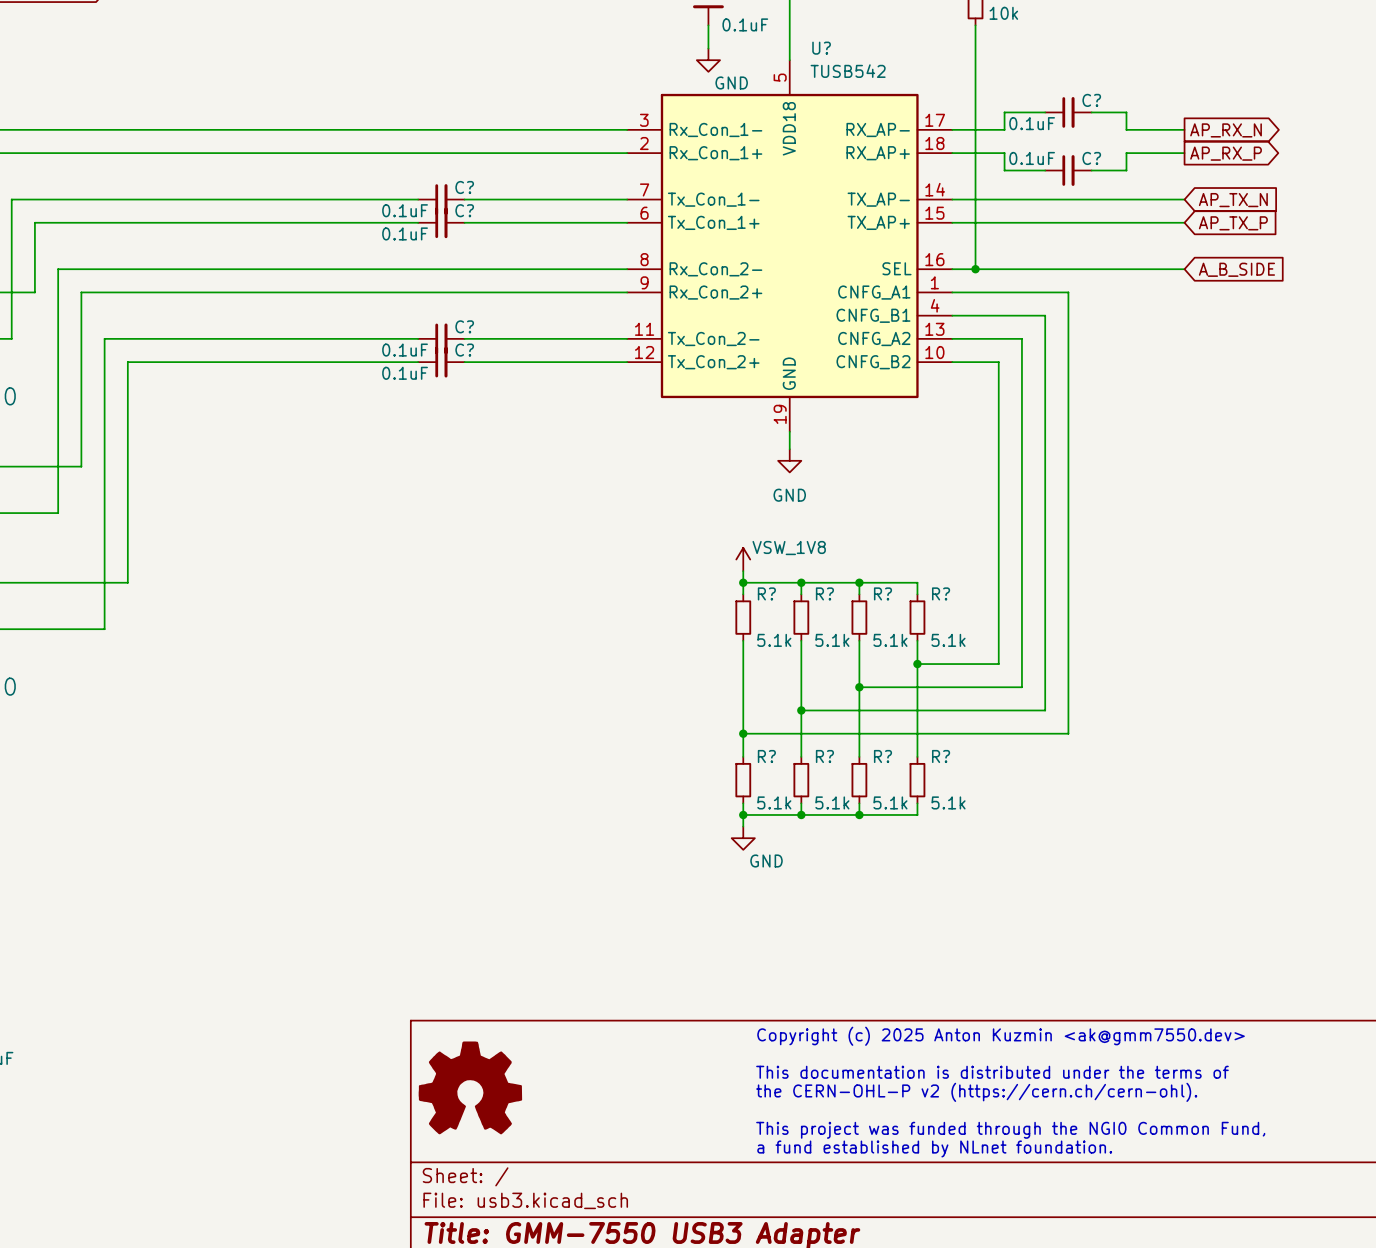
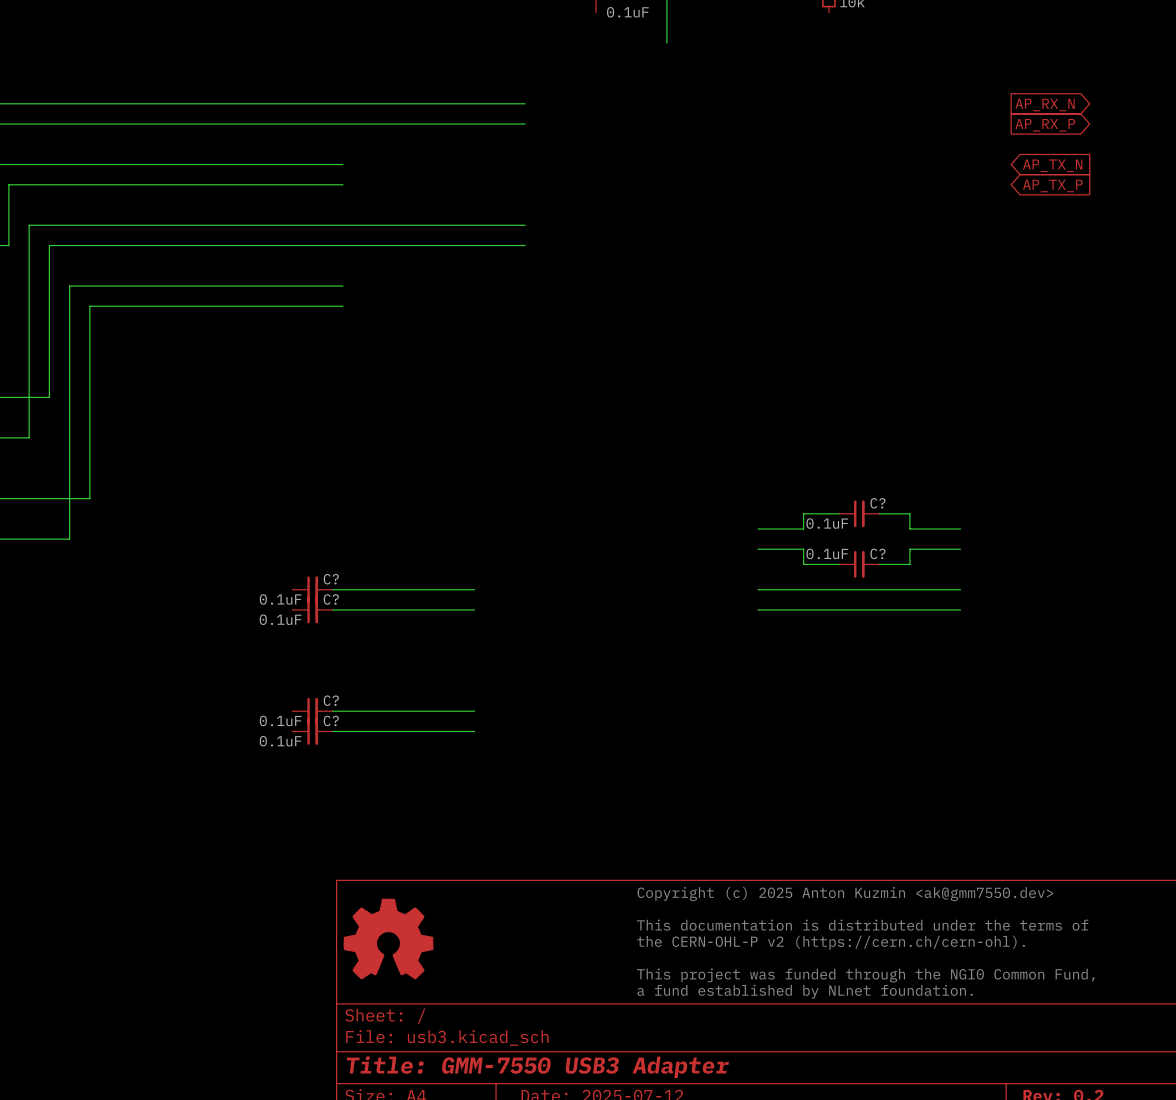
wire: (708, 25) (708, 48) -> none
wire: (975, 25) (975, 269) -> none
power symbol: GND (708, 60) -> none
wire: (1045, 112) (1004, 112) (1004, 129) (952, 129) -> none
C?: 0.1uF (1068, 112) -> none
wire: (1091, 112) (1126, 112) (1126, 129) (1184, 129) -> none
wire: (952, 153) (1004, 153) (1004, 170) (1045, 170) -> none
wire: (1184, 153) (1126, 153) (1126, 170) (1091, 170) -> none
C?: 0.1uF (1068, 170) -> none
C?: 0.1uF (441, 199) -> none
wire: (464, 199) (627, 199) -> none
wire: (952, 199) (1184, 199) -> none
C?: 0.1uF (441, 222) -> none
wire: (464, 222) (627, 222) -> none
wire: (952, 222) (1184, 222) -> none
U?: TUSB542 (789, 245) -> none
wire: (952, 269) (1184, 269) -> none
junction: (975, 269) -> none
global label: A_B_SIDE (1236, 269) -> none
wire: (952, 292) (1068, 292) (1068, 600) -> (879, 513) (909, 513)
wire: (952, 315) (1045, 315) (1045, 710) -> (960, 609) (889, 609)
C?: 0.1uF (441, 338) -> none
wire: (464, 338) (627, 338) -> none
wire: (952, 338) (1021, 338) (1021, 687) -> (960, 589) (869, 589)
C?: 0.1uF (441, 362) -> none
wire: (464, 362) (627, 362) -> none
wire: (952, 362) (998, 362) (998, 664) (917, 664) -> none
wire: (789, 431) (789, 449) -> none
power symbol: GND (789, 460) -> none
power symbol: VSW_1V8 (743, 559) -> none
wire: (743, 571) (743, 594) -> none
wire: (743, 582) (917, 582) (917, 594) -> none
junction: (743, 582) -> none
wire: (801, 582) (801, 594) -> none
junction: (801, 582) -> none
wire: (859, 582) (859, 594) -> none
junction: (859, 582) -> none
wire: none -> (839, 513) (803, 513) (803, 528) (758, 528)
C?: none -> 0.1uF (859, 513)
R?: 5.1k (743, 617) -> none
R?: 5.1k (801, 617) -> none
R?: 5.1k (859, 617) -> none
R?: 5.1k (917, 617) -> none
wire: (1068, 617) (1068, 640) -> (909, 528) (960, 528)
wire: (743, 640) (743, 756) -> none
wire: (801, 640) (801, 756) -> none
wire: (859, 640) (859, 756) -> none
wire: none -> (758, 549) (803, 549) (803, 564) (839, 564)
wire: (917, 640) (917, 756) -> none
wire: none -> (909, 549) (960, 549)
C?: none -> 0.1uF (859, 564)
wire: (1068, 658) (1068, 733) (743, 733) -> (909, 564) (879, 564)
junction: (917, 664) -> none
C?: none -> 0.1uF (312, 589)
wire: none -> (332, 589) (474, 589)
wire: (859, 687) (894, 687) -> none
junction: (859, 687) -> none
C?: none -> 0.1uF (312, 609)
wire: none -> (332, 609) (474, 609)
wire: (801, 710) (894, 710) -> none
junction: (801, 710) -> none
junction: (743, 733) -> none
R?: 5.1k (743, 780) -> none
R?: 5.1k (801, 780) -> none
R?: 5.1k (859, 780) -> none
R?: 5.1k (917, 780) -> none
wire: (743, 803) (743, 826) -> none
wire: (801, 803) (801, 814) -> none
wire: (859, 803) (859, 814) -> none
wire: (917, 803) (917, 814) (743, 814) -> none
junction: (743, 814) -> none
junction: (801, 814) -> none
junction: (859, 814) -> none
C?: none -> 0.1uF (312, 711)
wire: none -> (332, 711) (474, 711)
power symbol: GND (743, 838) -> none
C?: none -> 0.1uF (312, 731)
wire: none -> (332, 731) (474, 731)

